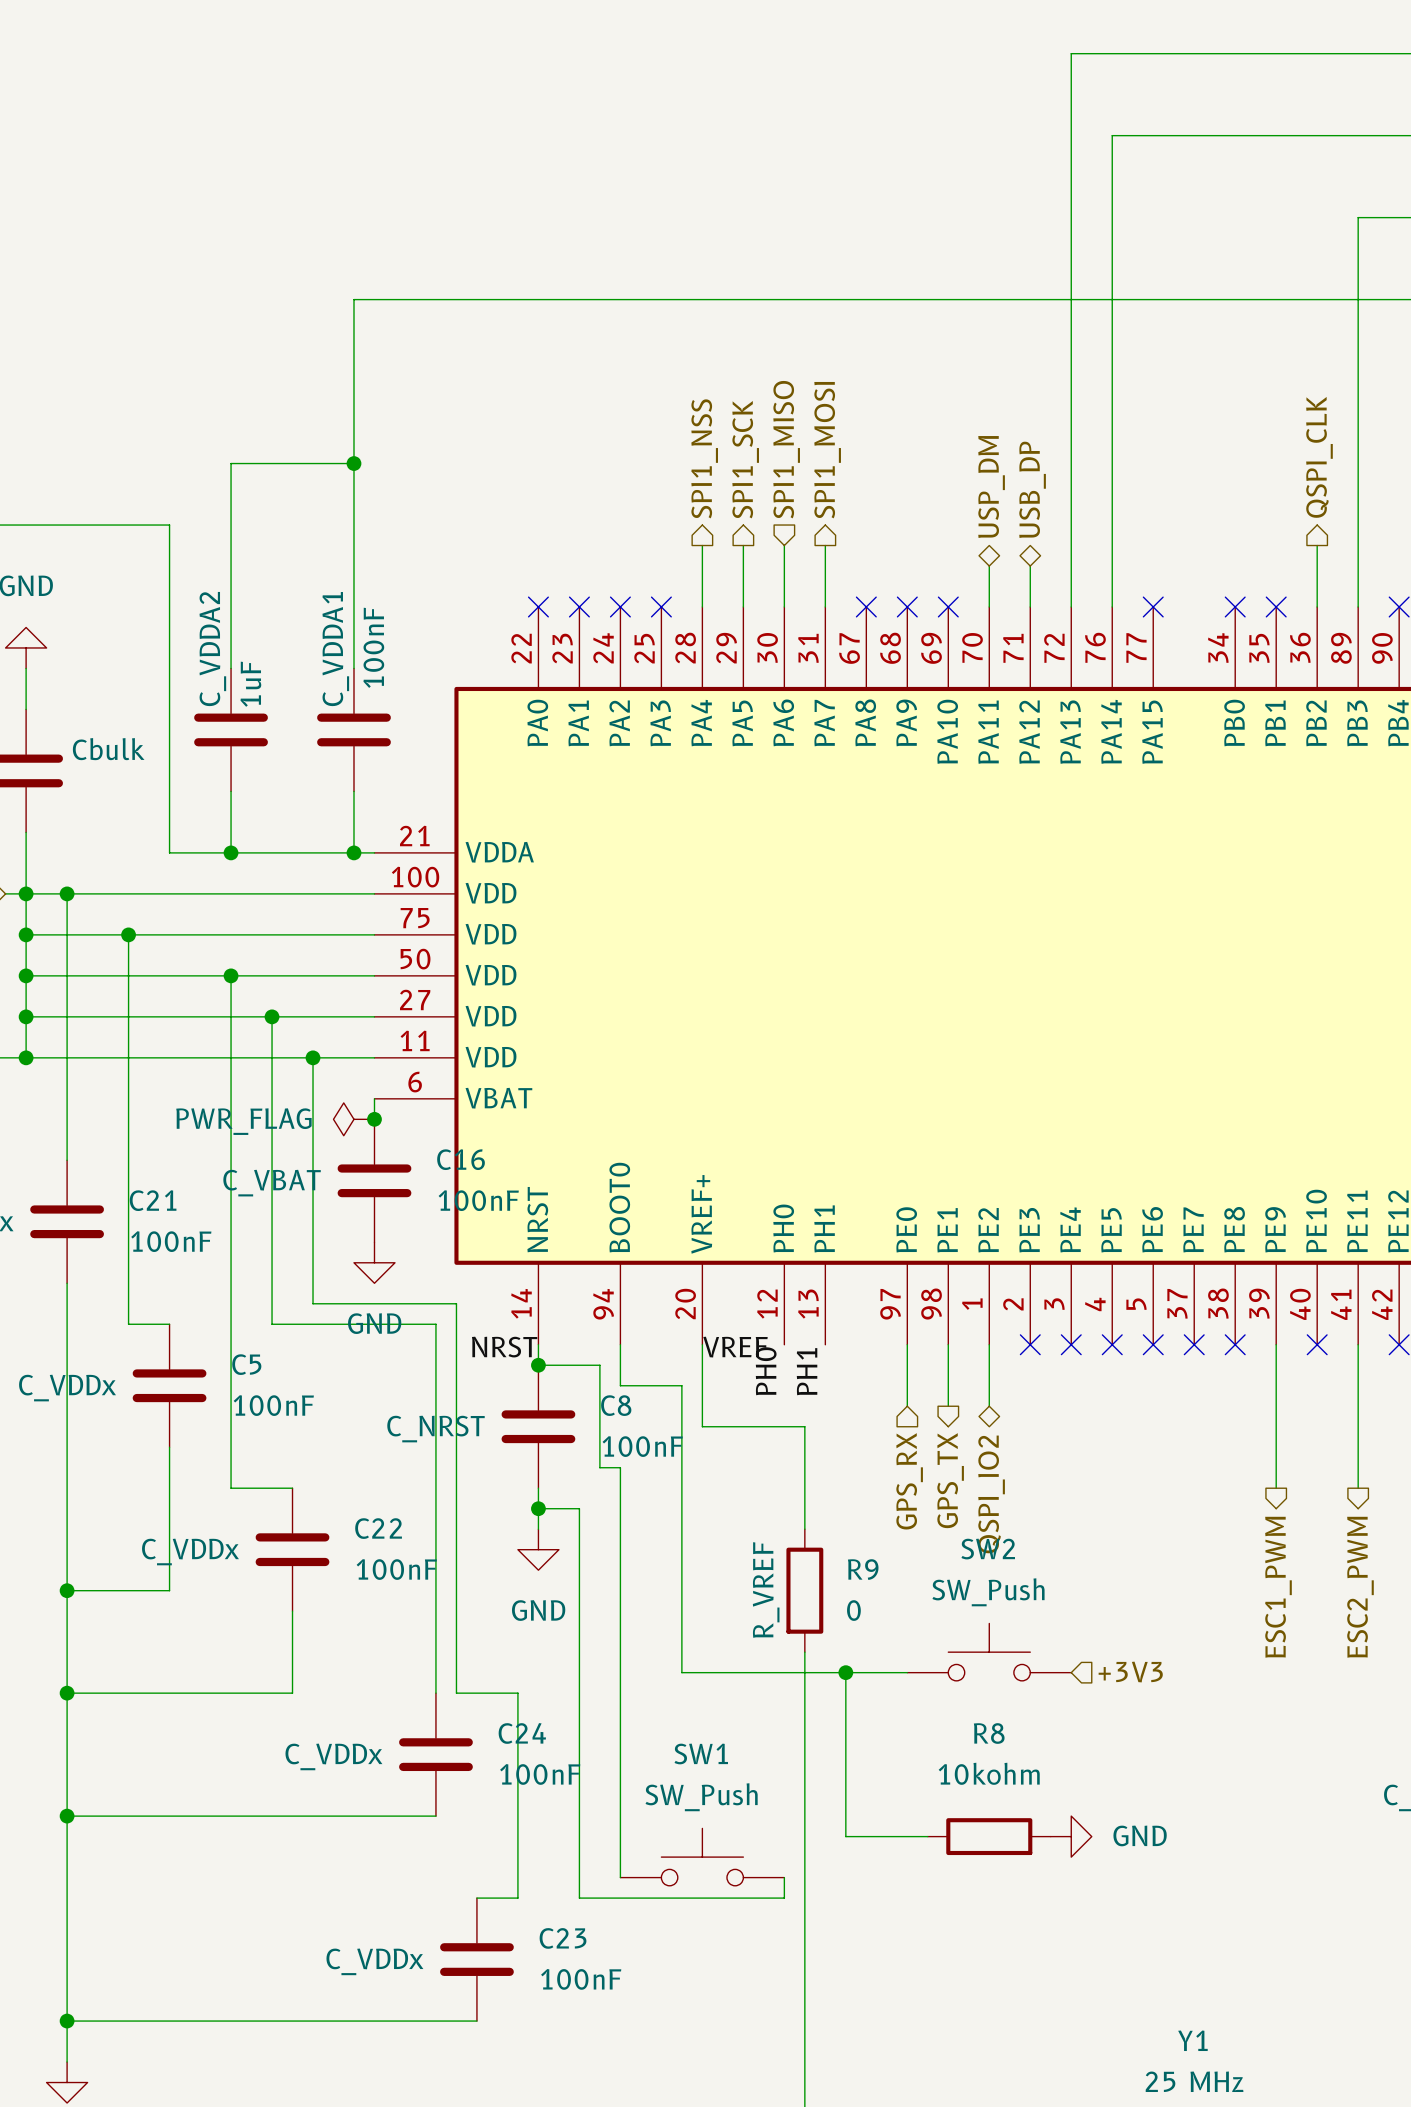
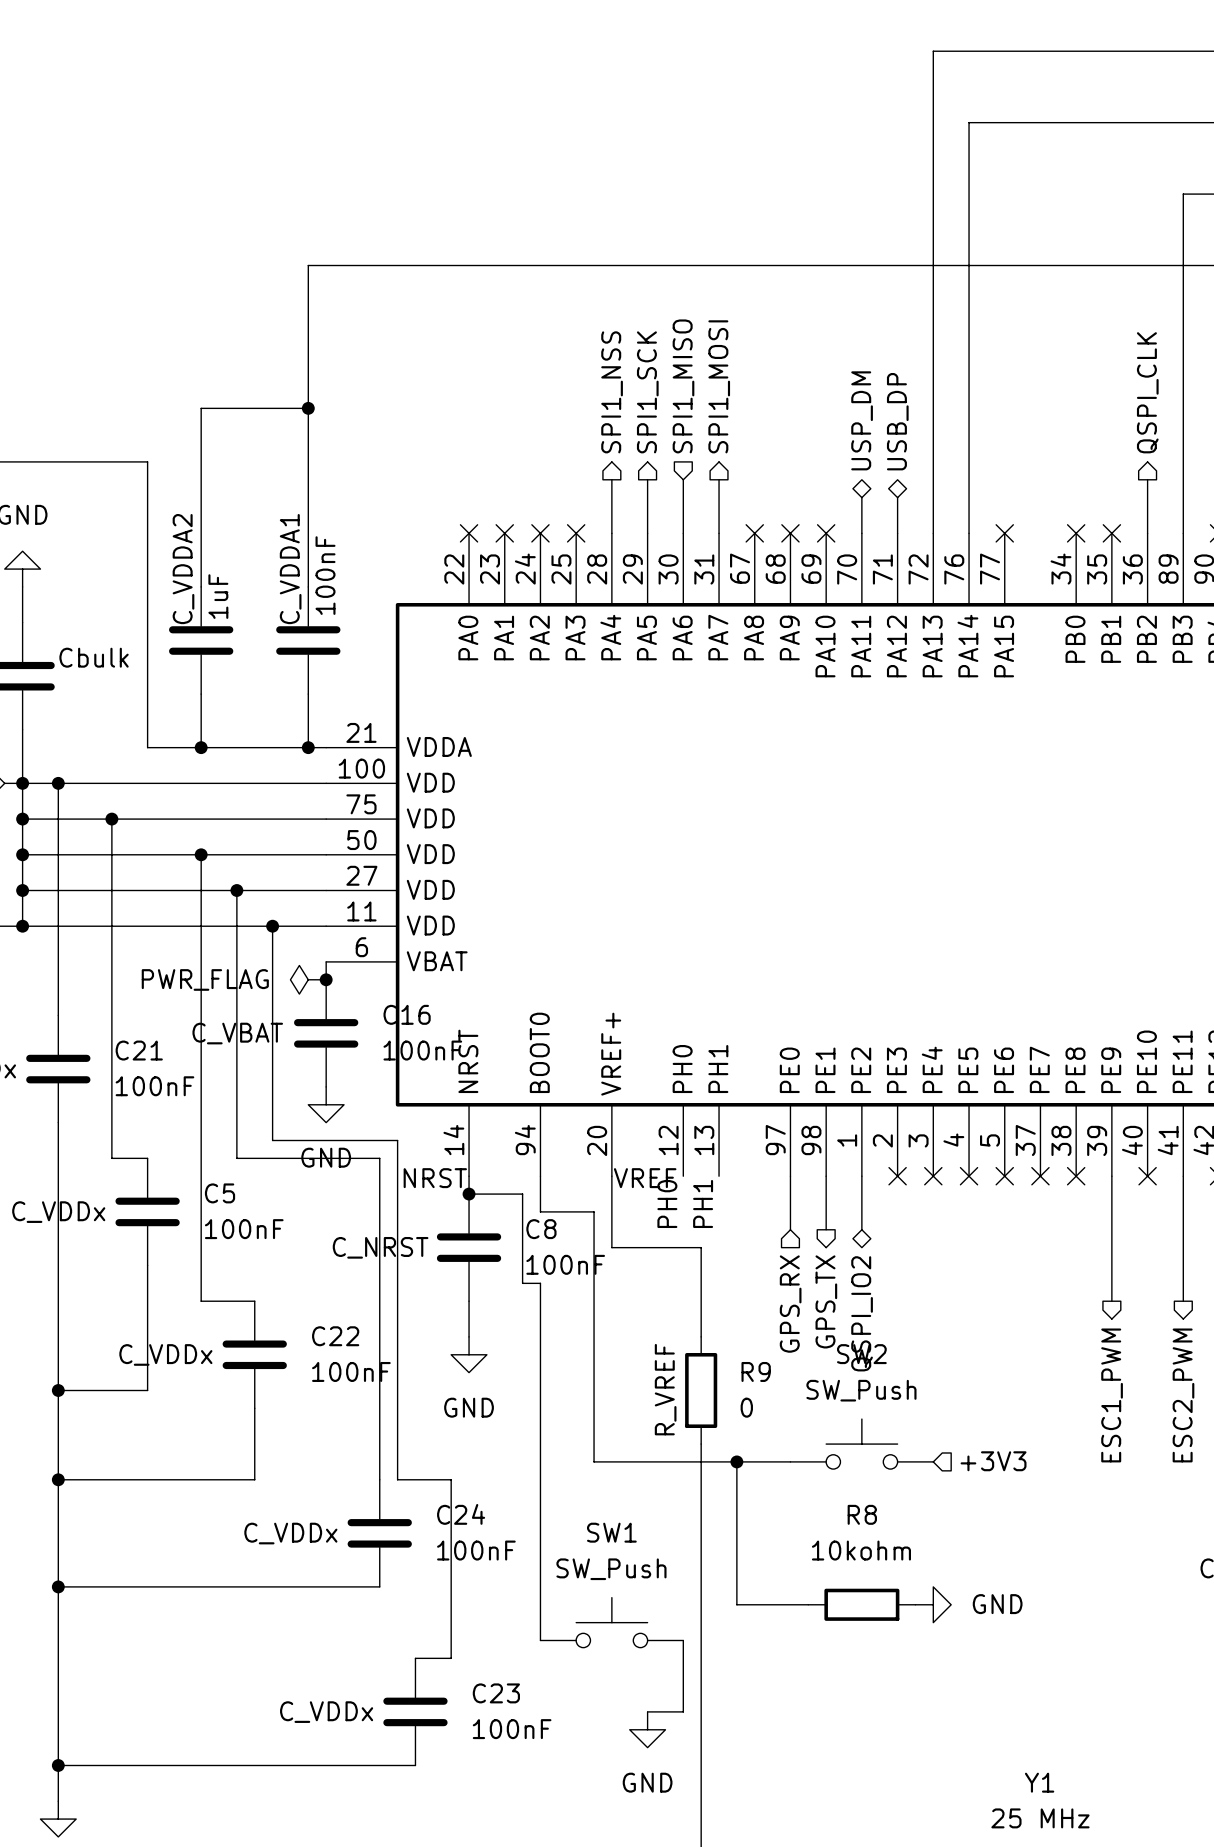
wire: (538, 1508) (579, 1508) (579, 1898) (784, 1898) -> (647, 1711) (683, 1711) (683, 1658)
junction: (538, 1508) -> none
power symbol: none -> GND (647, 1729)

